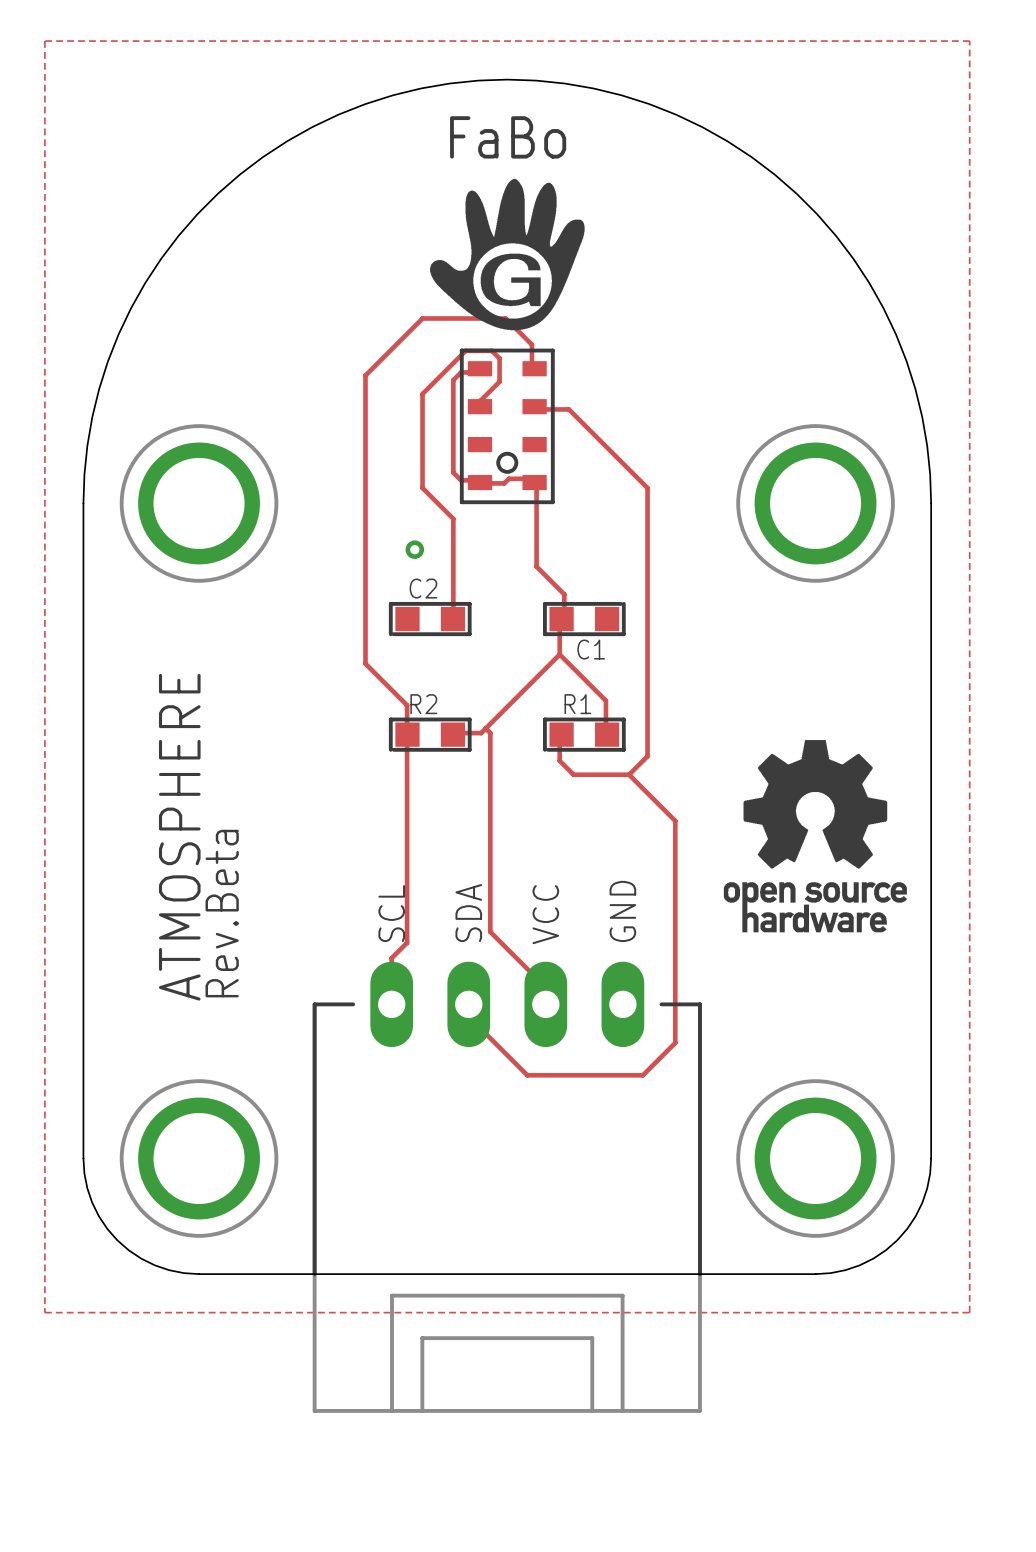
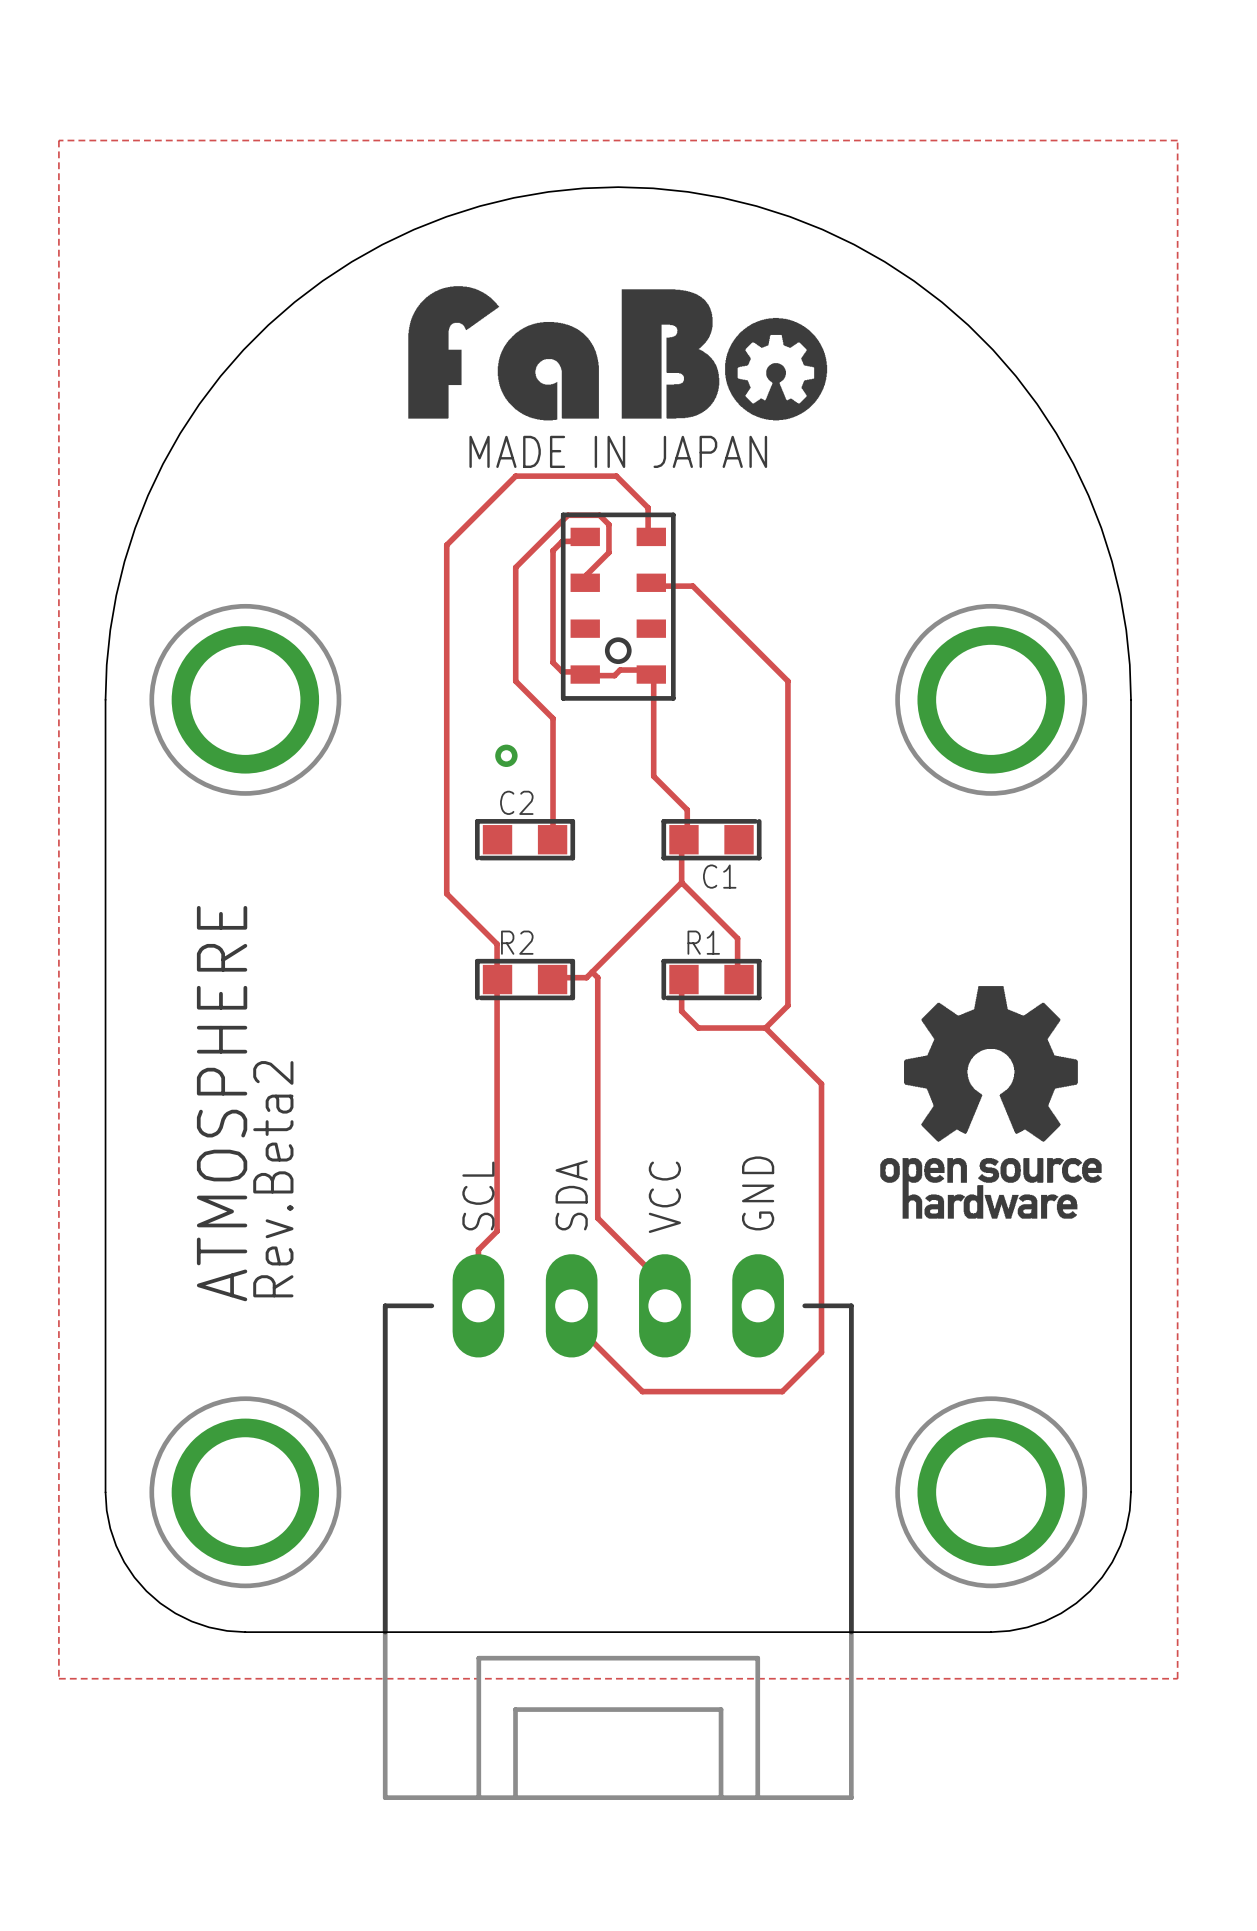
drawing: none -> [408, 286, 828, 421]
drawing: [430, 178, 585, 331] -> none
text: none -> MADE IN JAPAN (618, 451)
text: Rev.Beta (222, 913) -> Rev.Beta2 (273, 1179)

